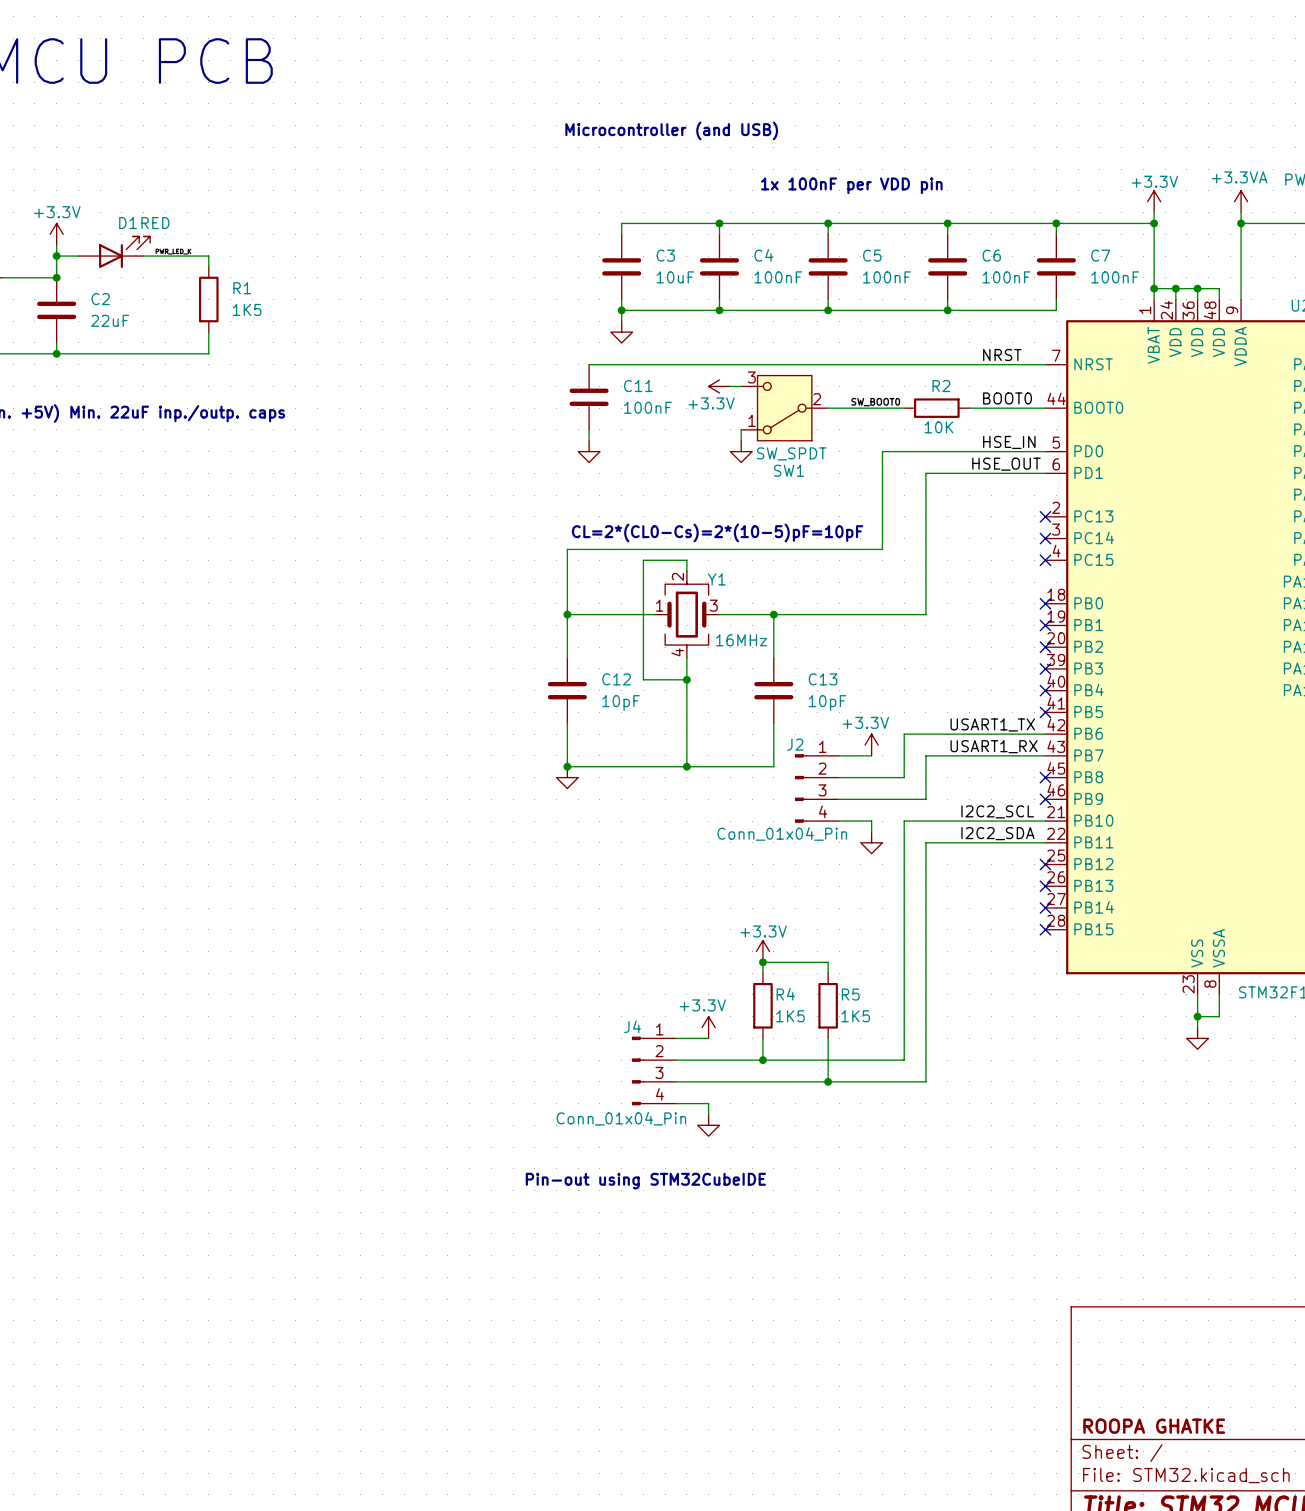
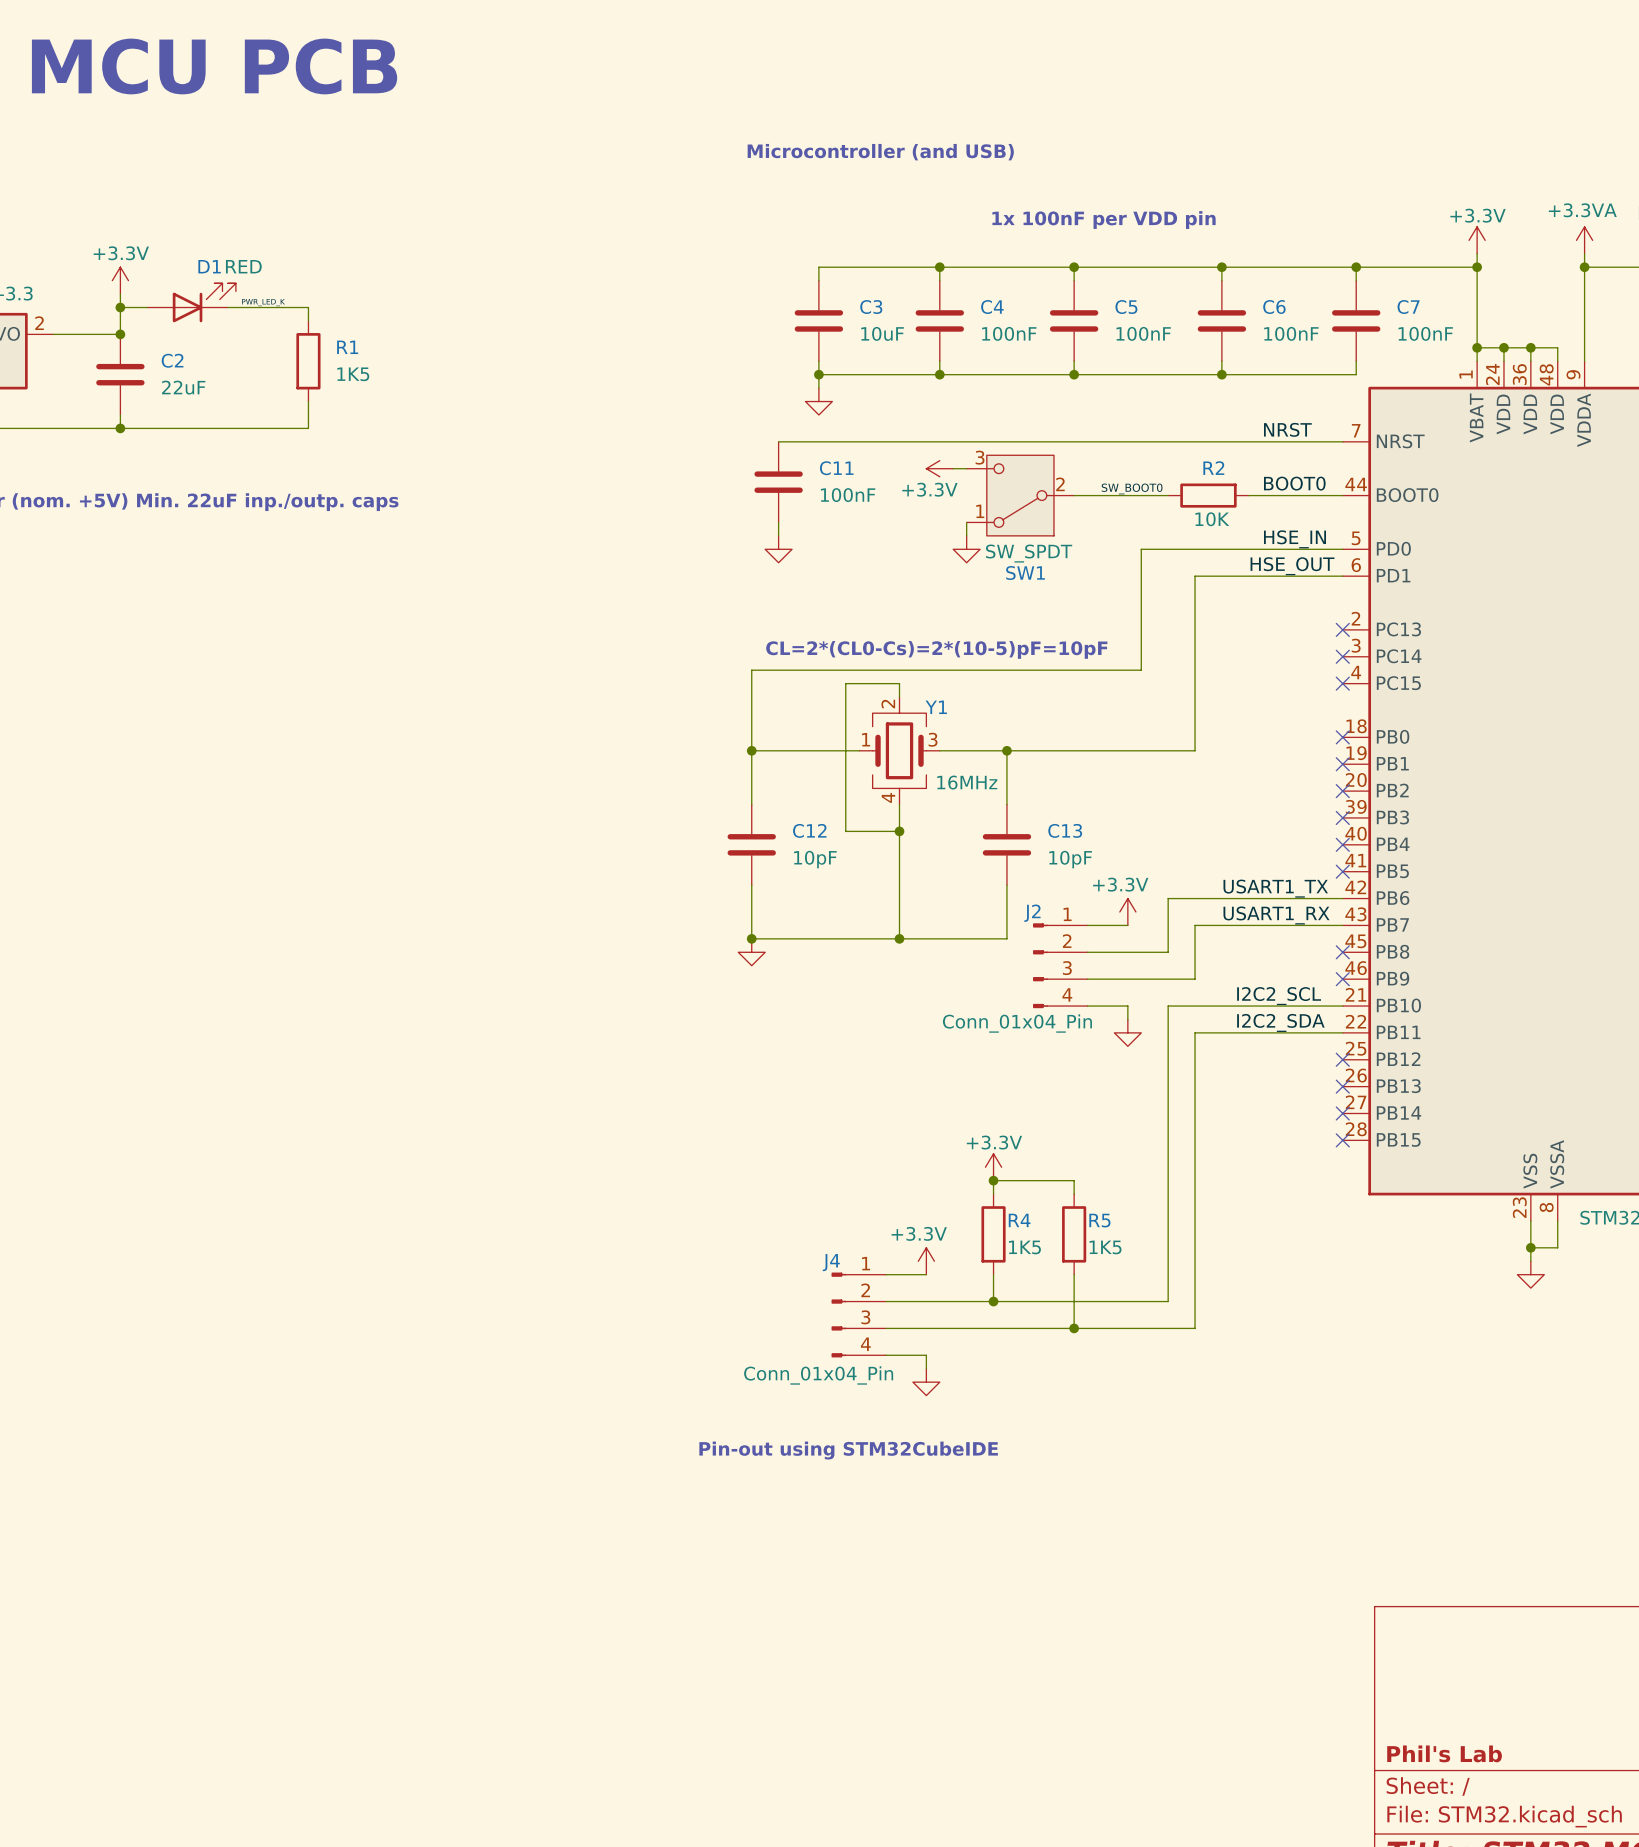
title block: ROOPA GHATKE (1154, 1426) -> Phil's Lab (1444, 1753)

